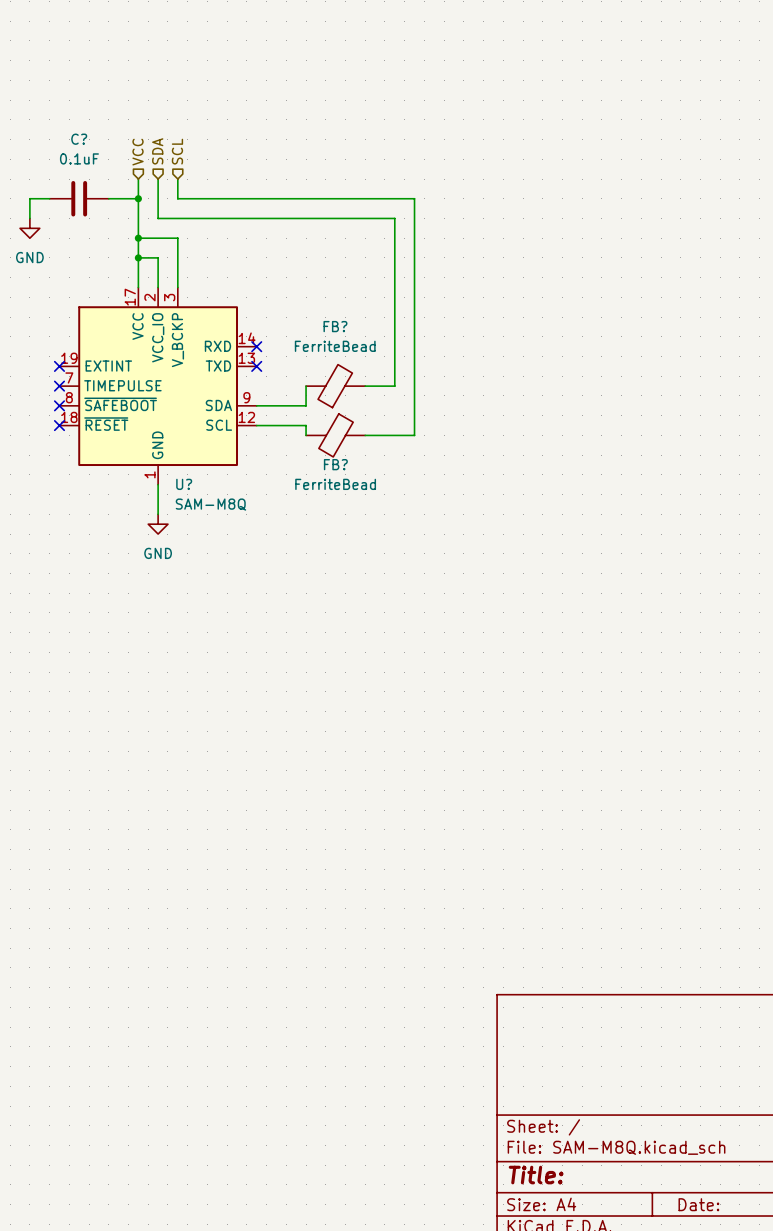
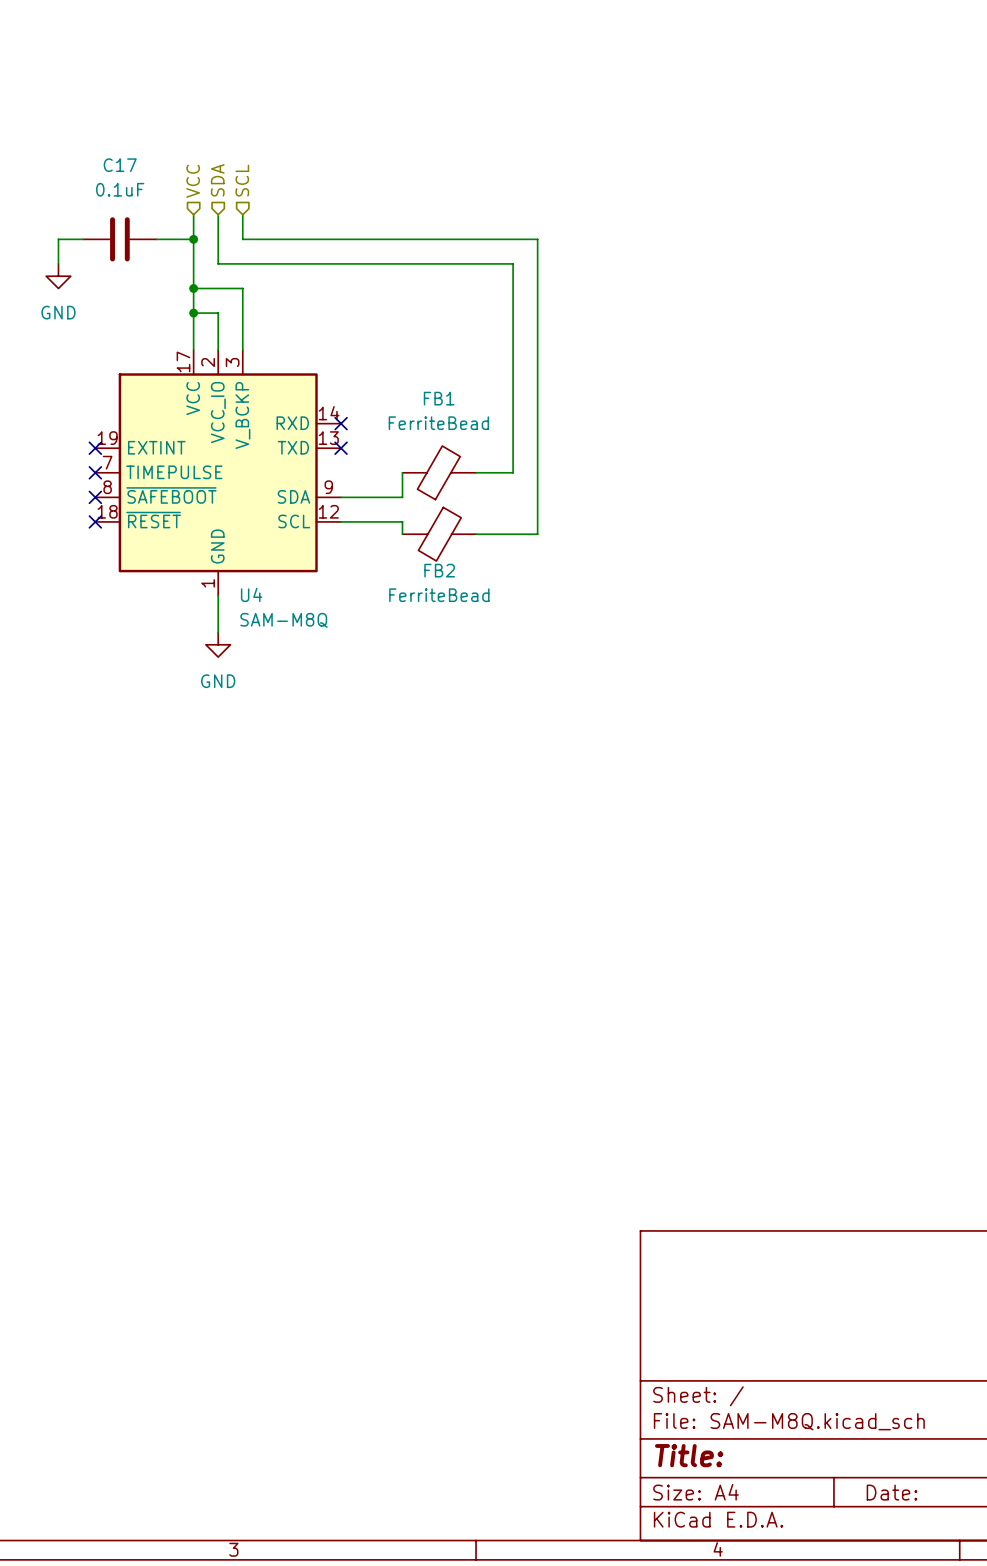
C? name: C? (79, 139) -> C17 (120, 165)
FB? name: FB? (335, 326) -> FB1 (439, 398)
FB? name: FB? (335, 464) -> FB2 (439, 570)
U? name: U? (184, 484) -> U4 (251, 594)

